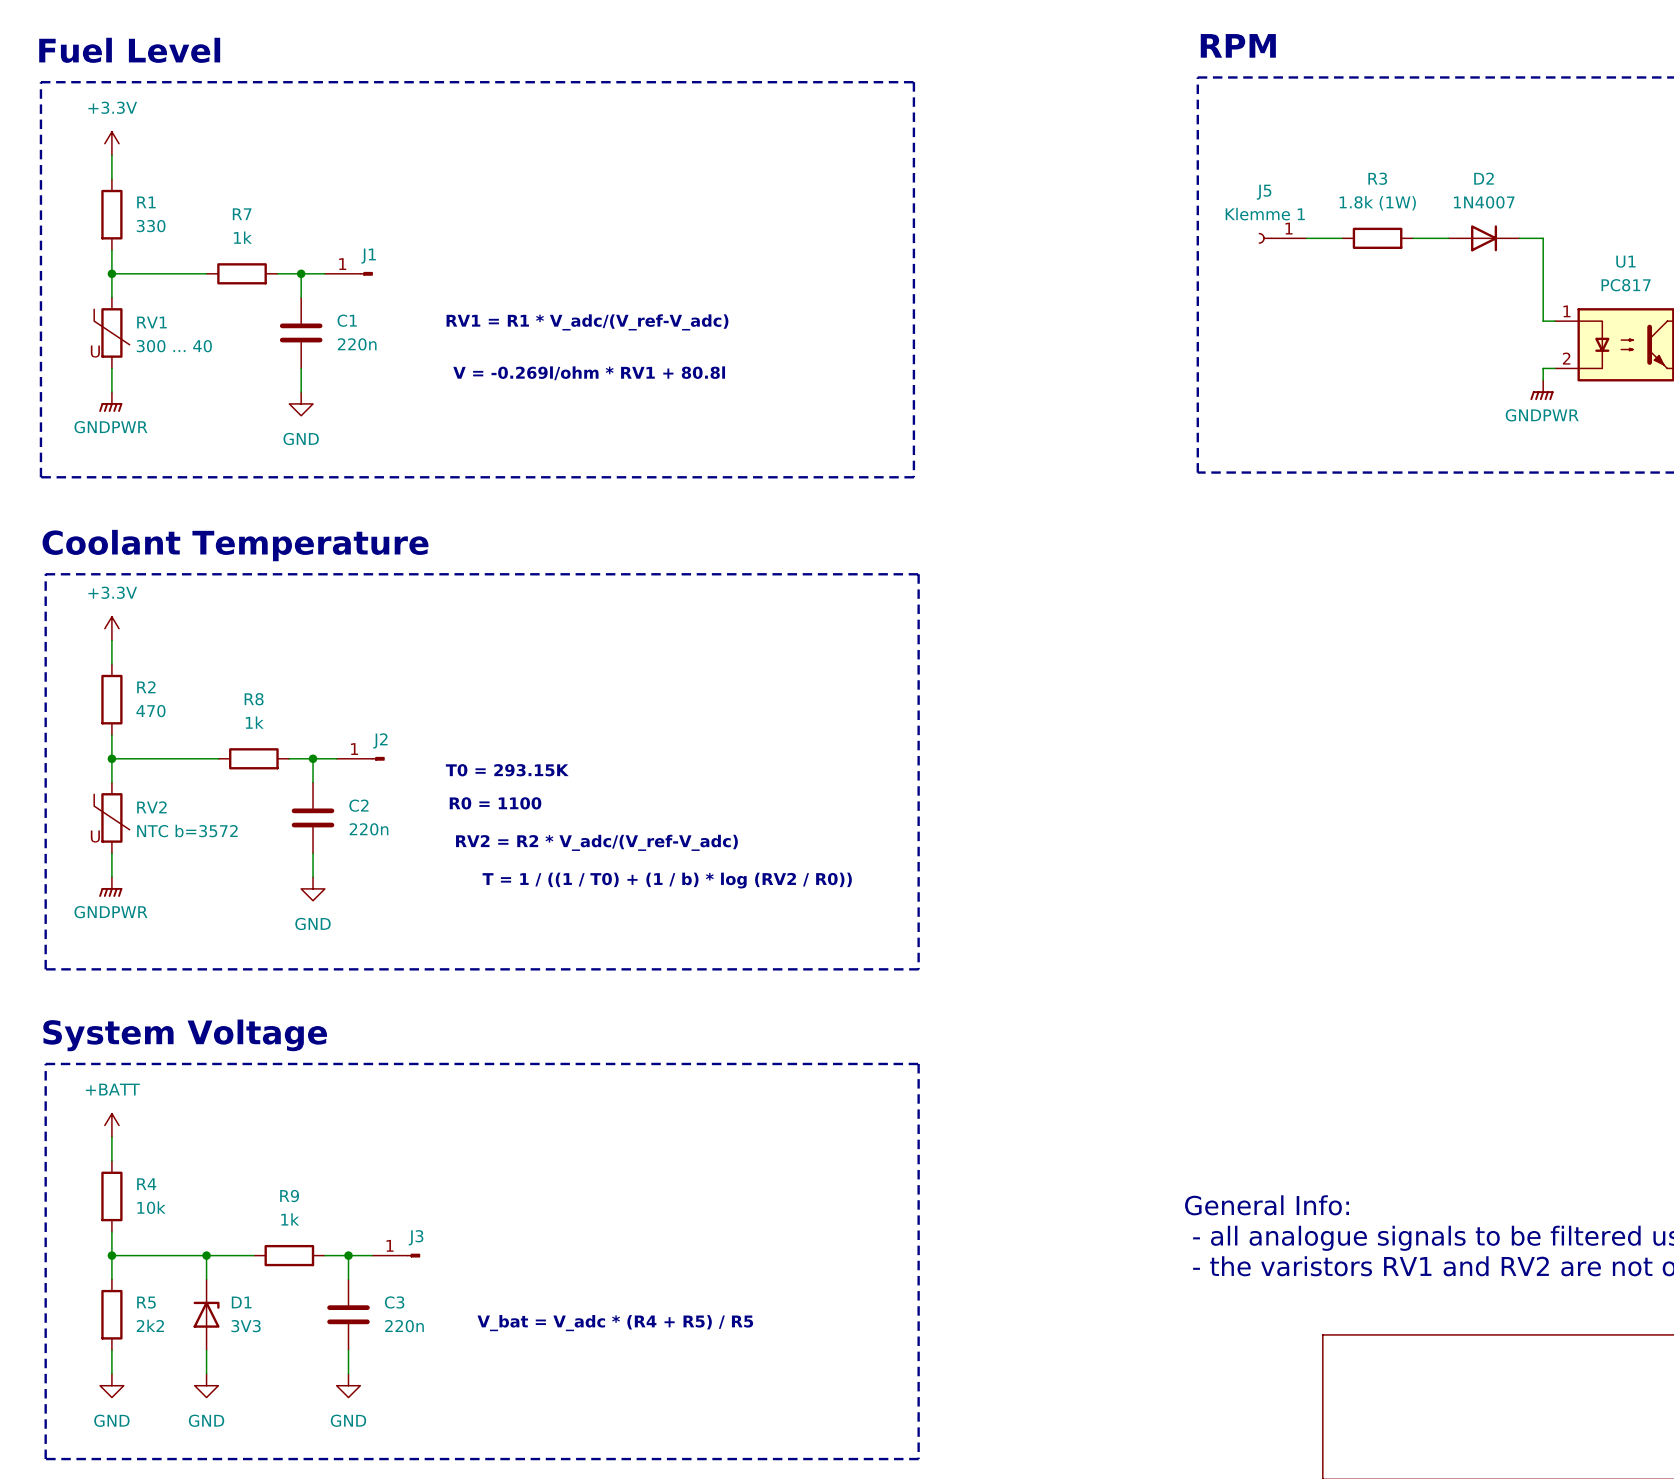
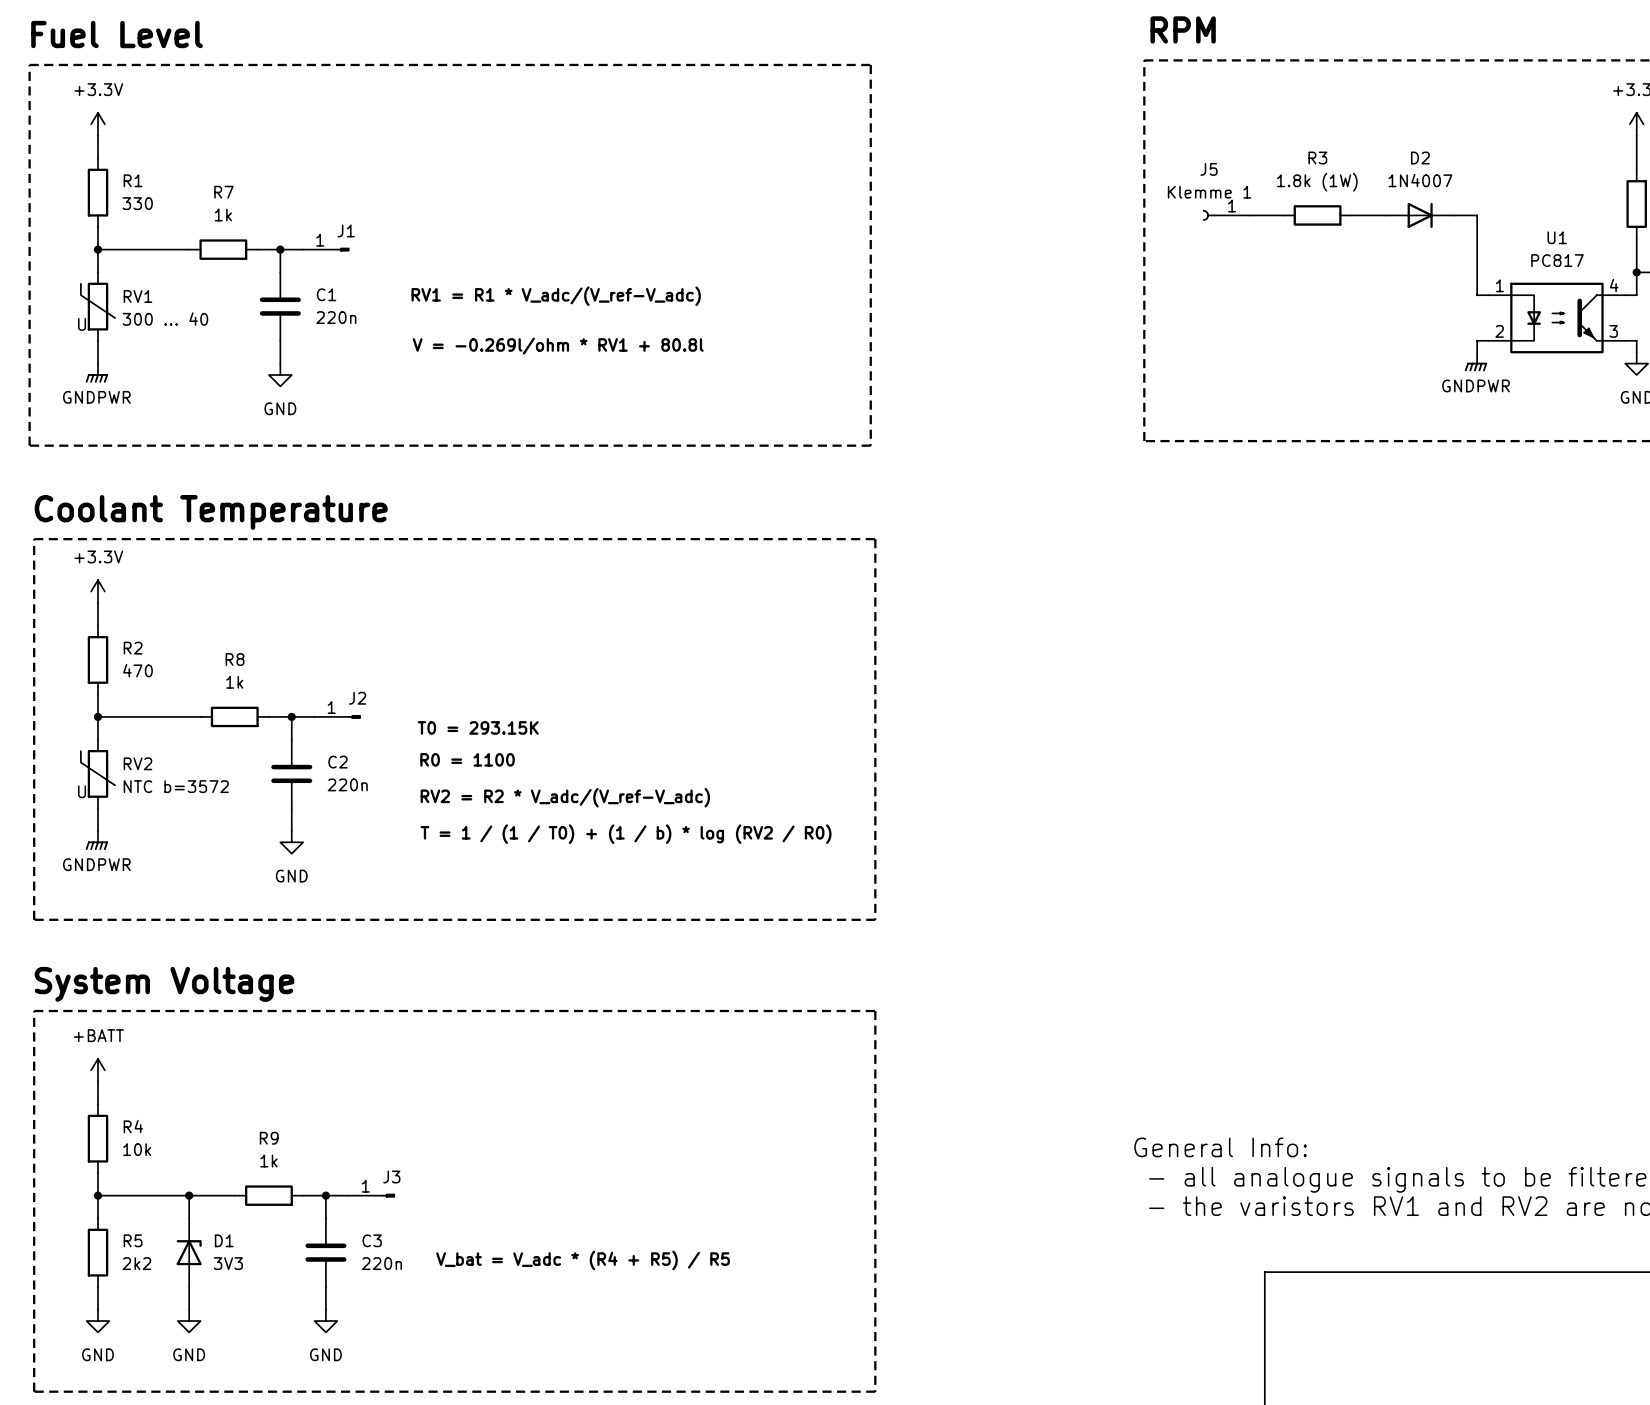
text: T = 1 / ((1 / T0) + (1 / b) * log (RV2 / R0)) (667, 880) -> T = 1 / (1 / T0) + (1 / b) * log (RV2 / R0) (626, 834)

